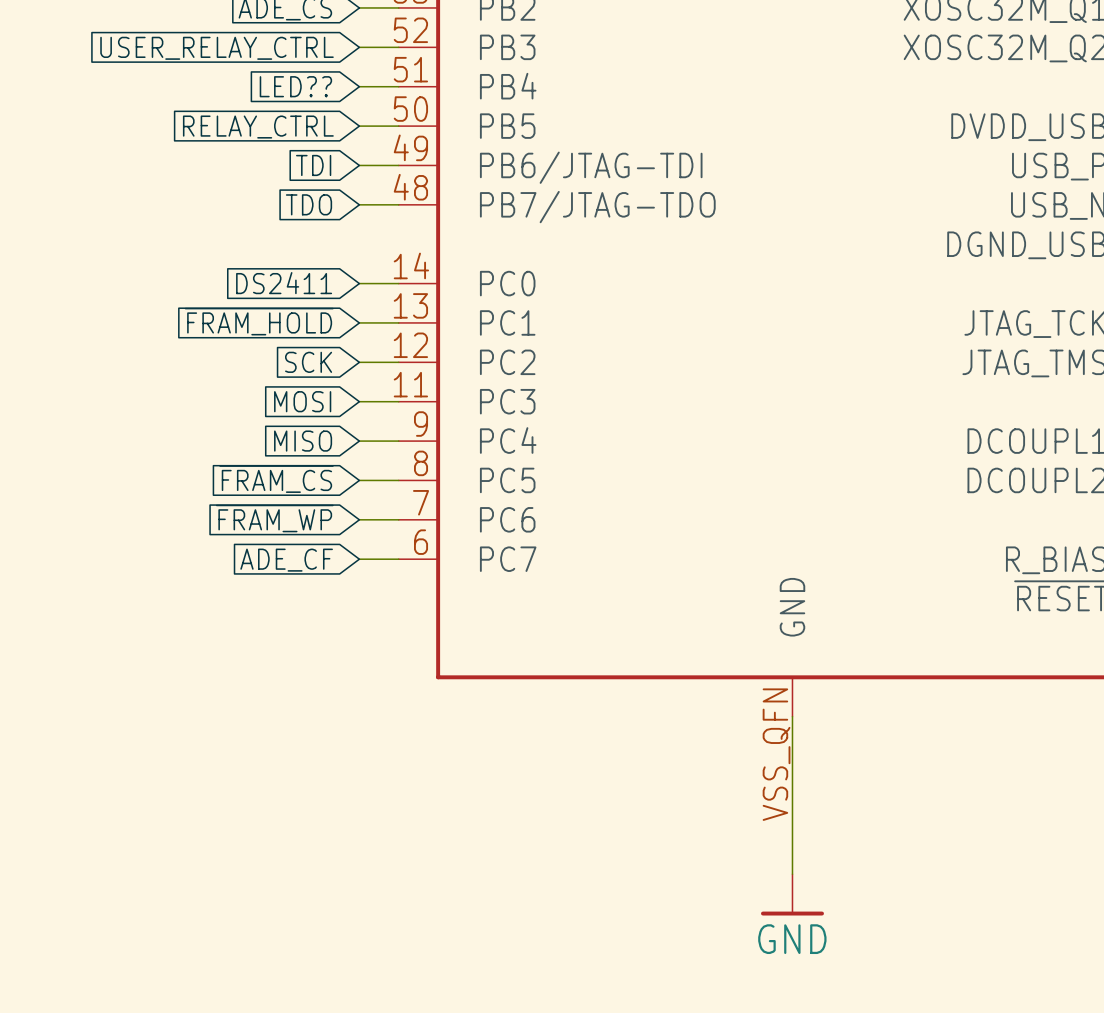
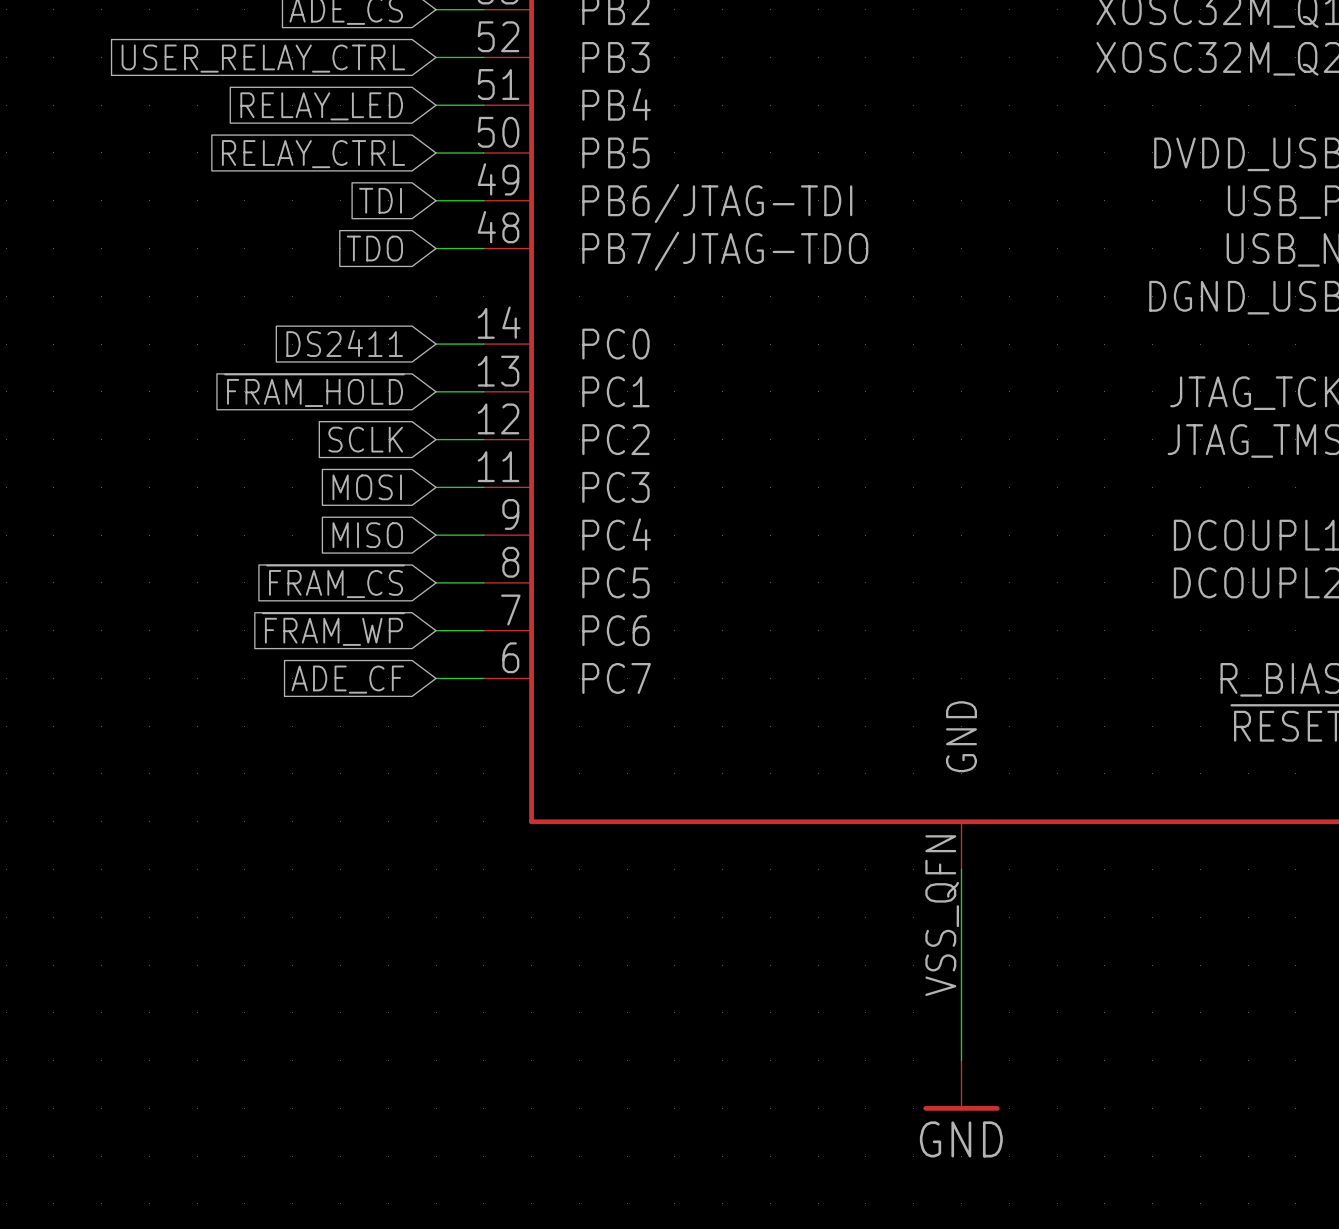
global label: LED?? (295, 86) -> RELAY_LED (321, 106)
global label: SCK (308, 362) -> SCLK (365, 439)

